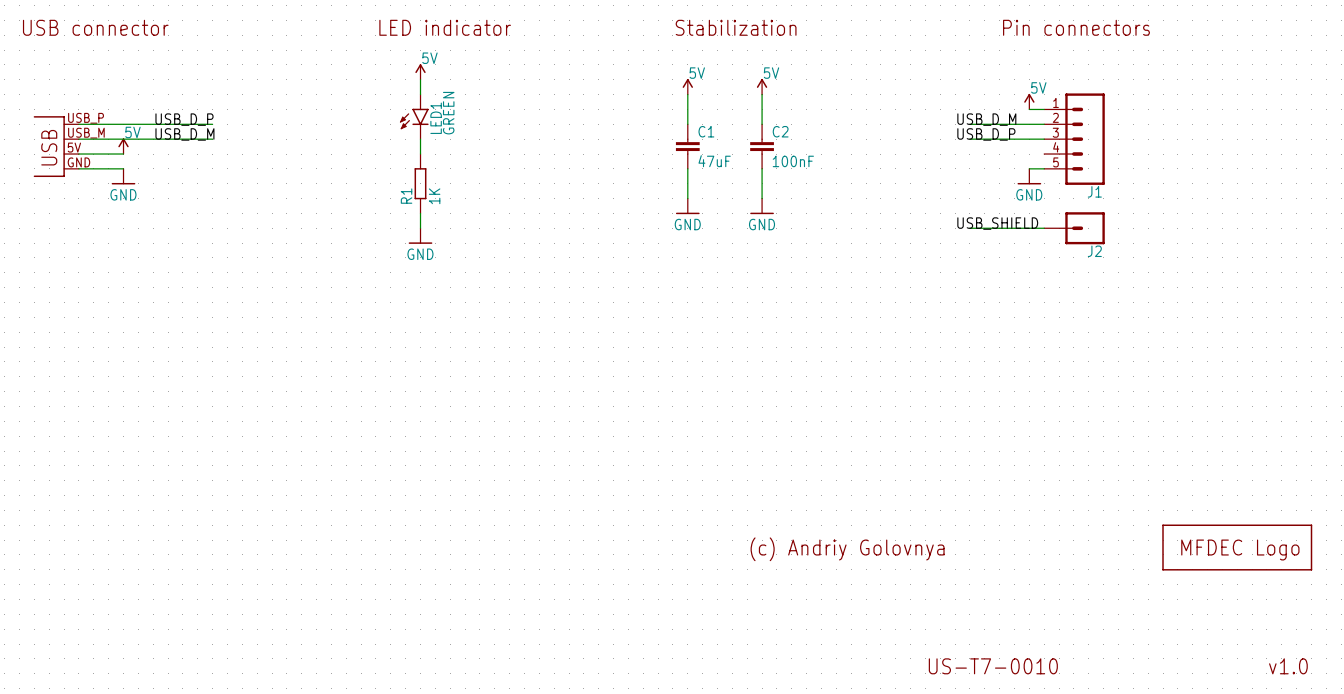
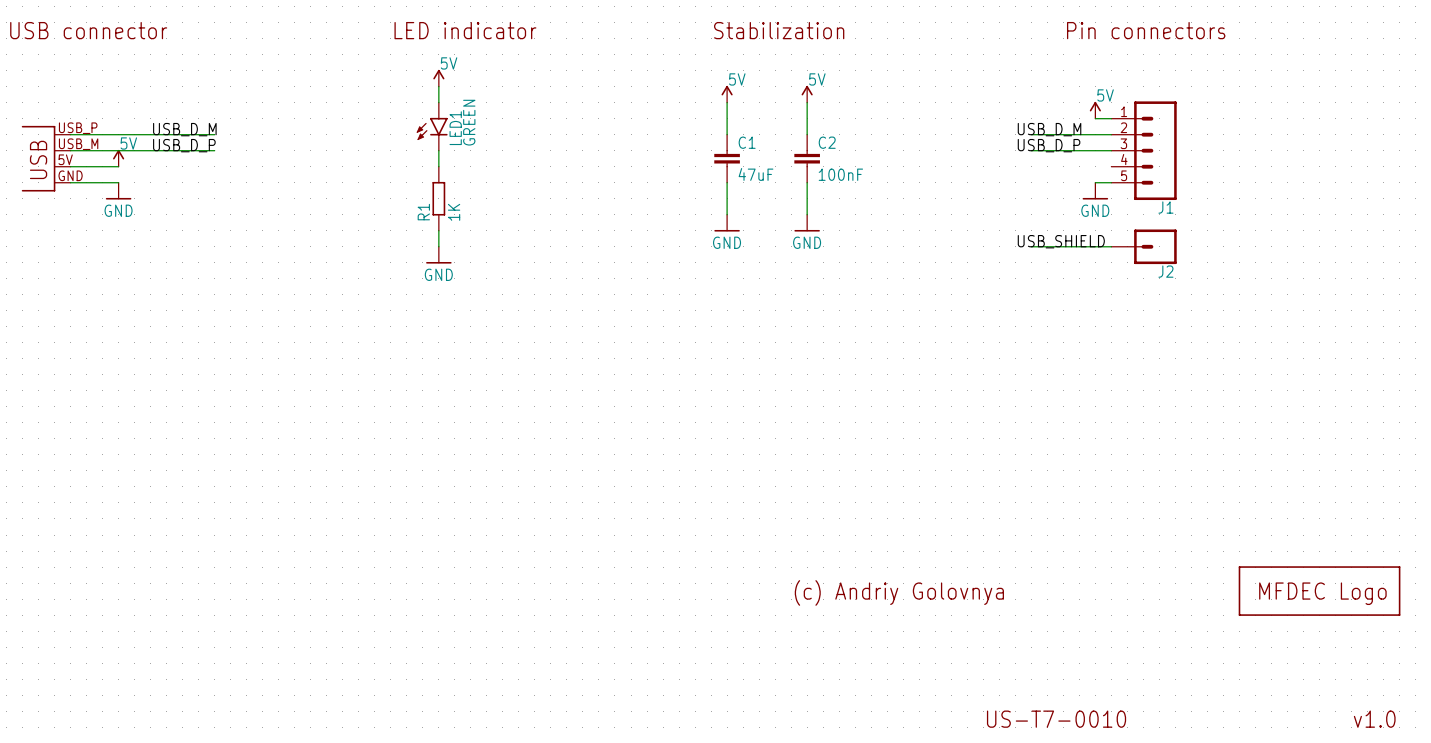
label: USB_D_P (184, 119) -> USB_D_M (184, 129)
label: USB_D_M (184, 134) -> USB_D_P (184, 145)

